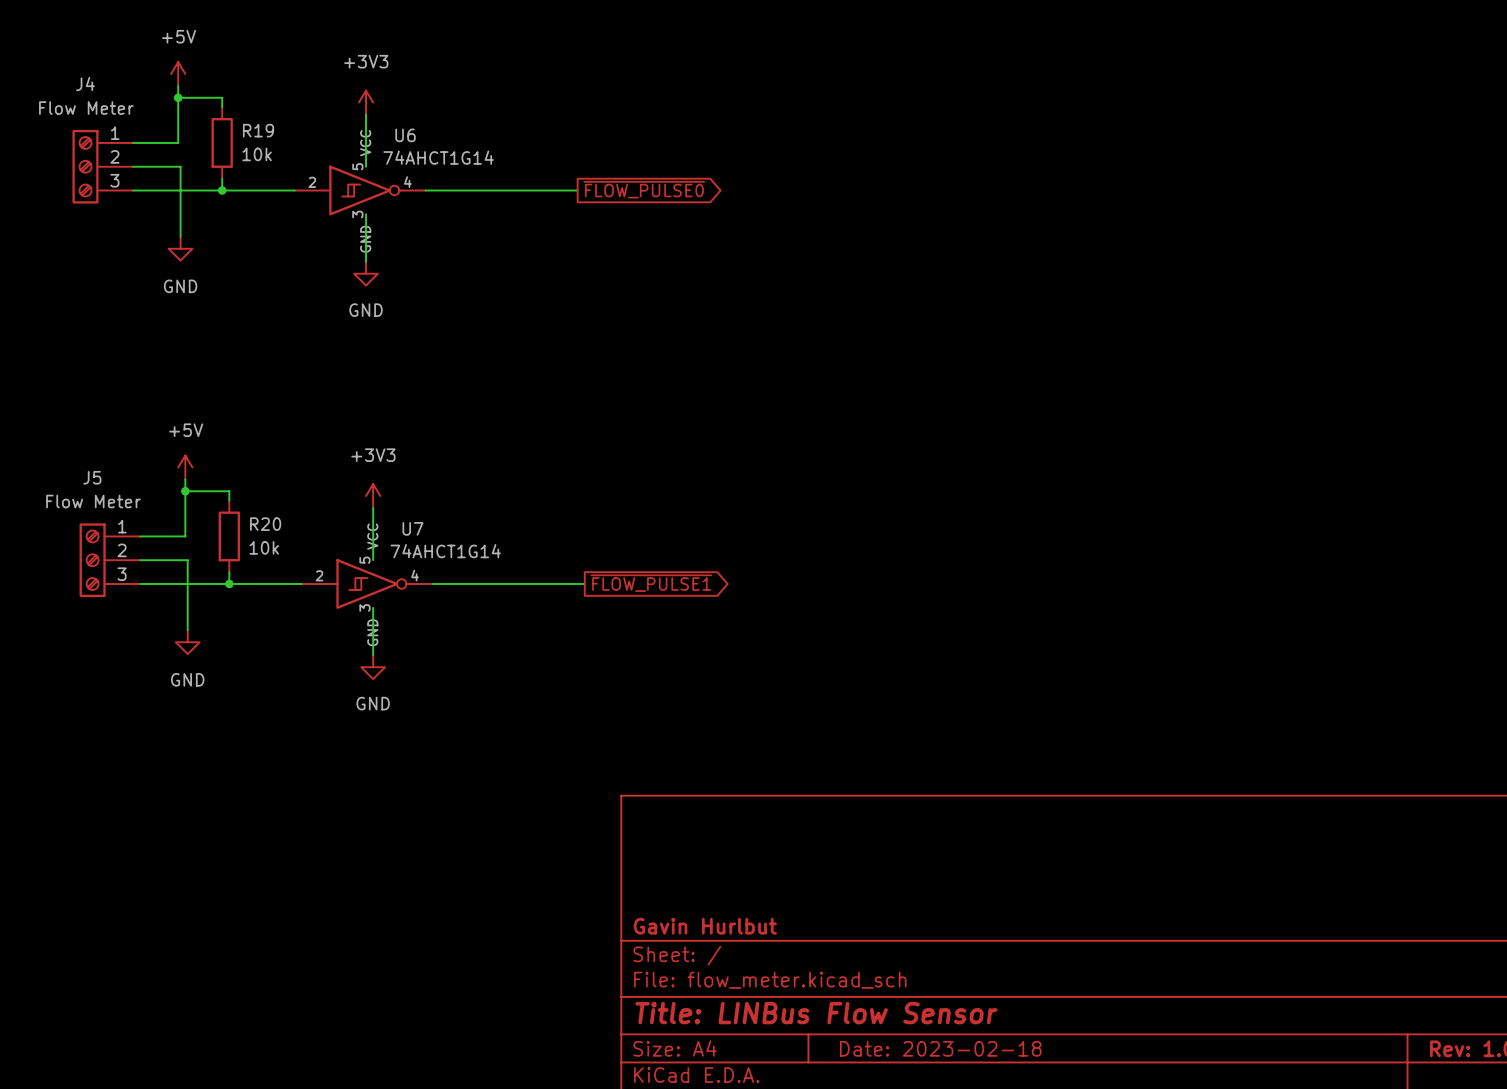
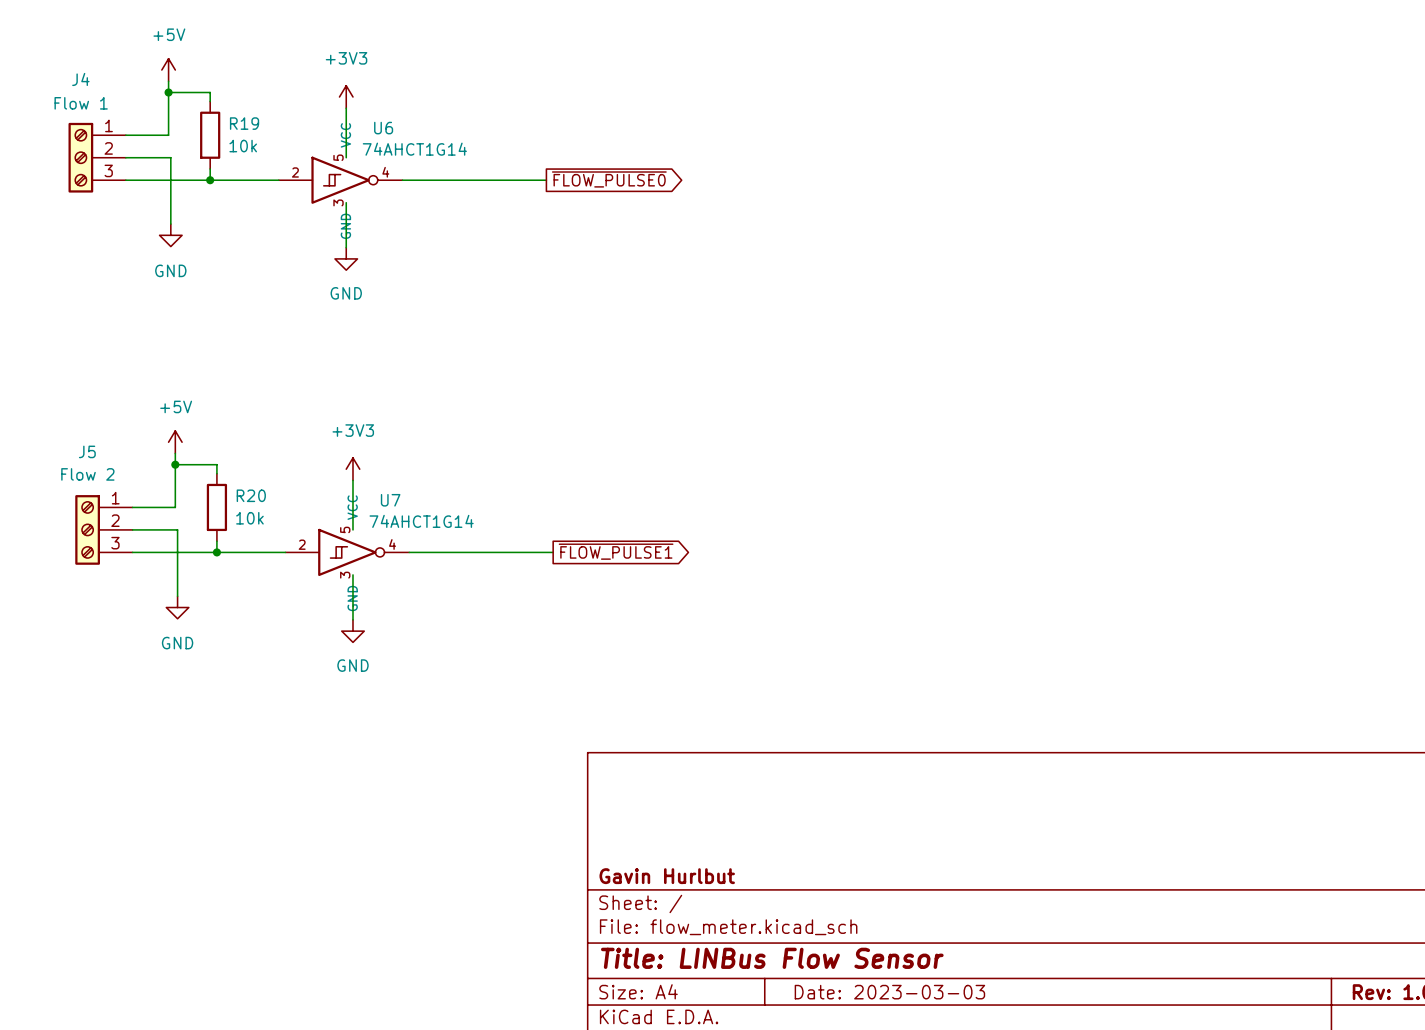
J4 value: Flow Meter (86, 108) -> Flow 1 (81, 103)
J5 value: Flow Meter (93, 501) -> Flow 2 (87, 474)
title block: Date: 2023-02-18 (940, 1048) -> Date: 2023-03-03 (889, 992)

